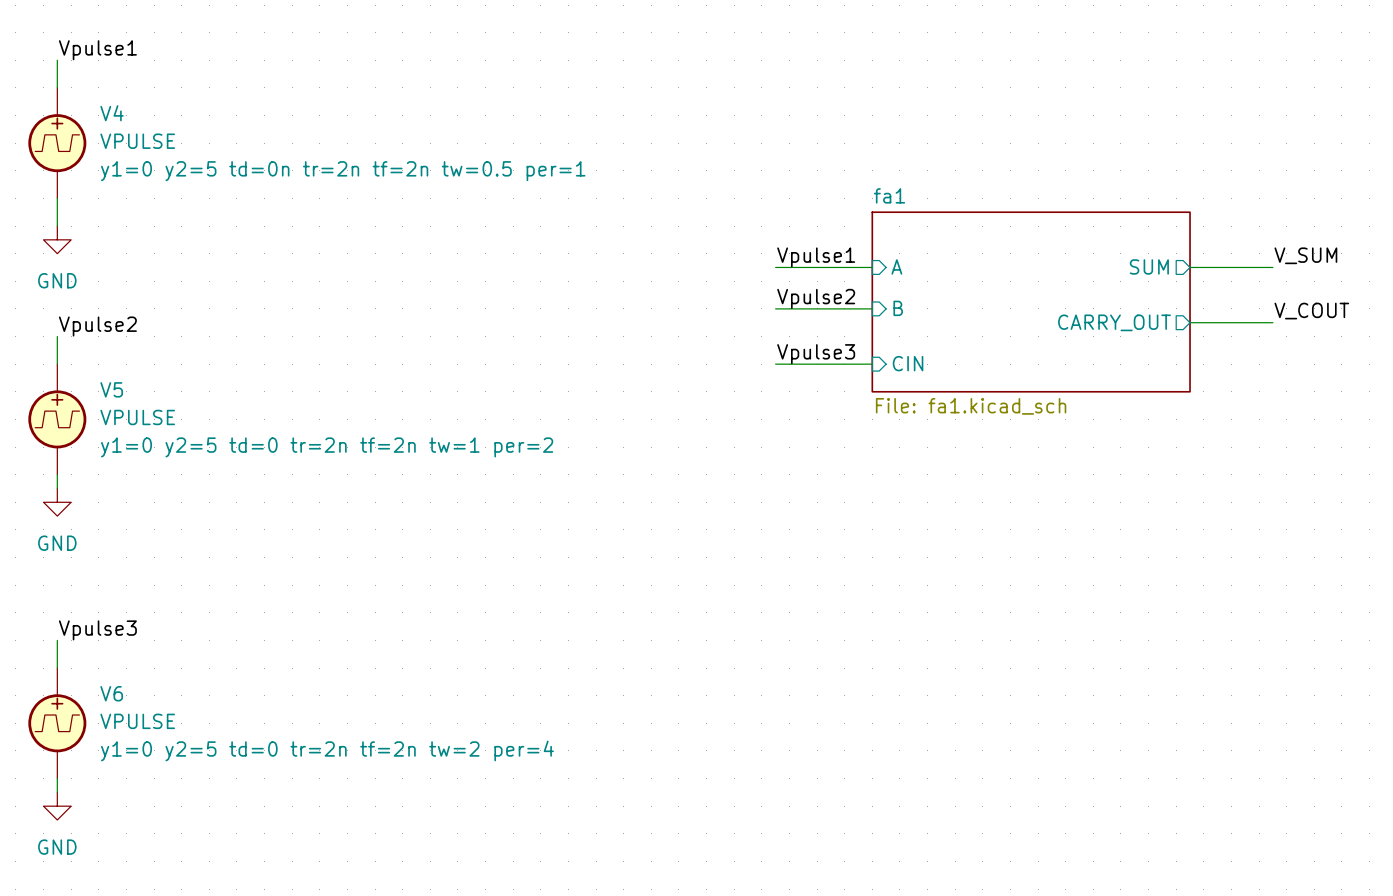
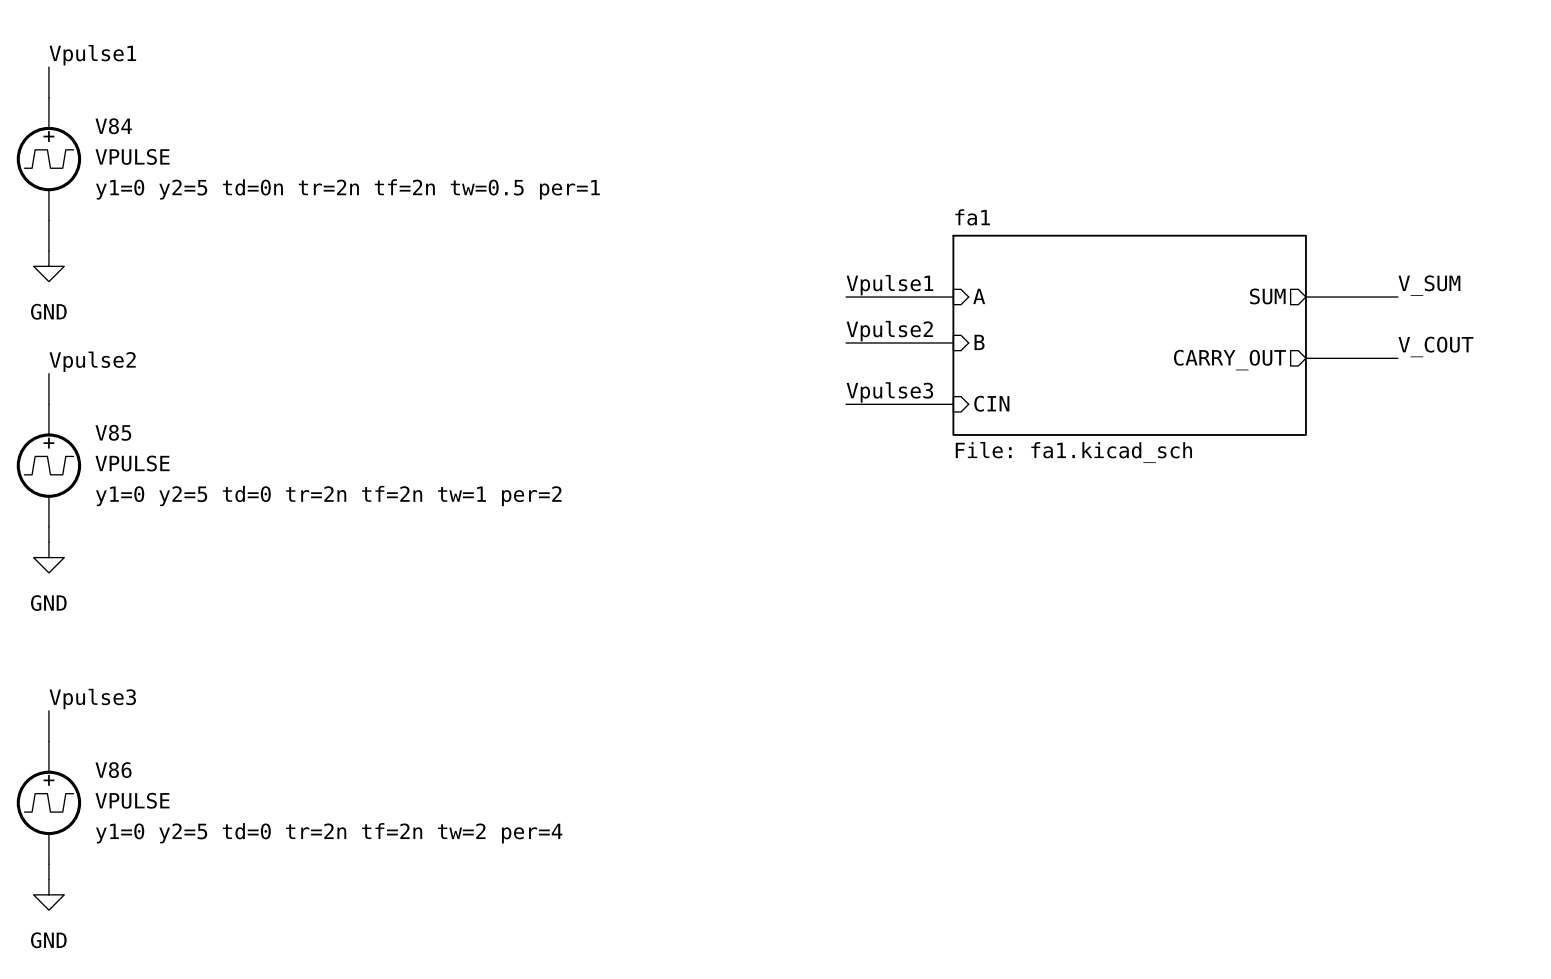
V4 name: V4 (112, 113) -> V84 (113, 126)
V5 name: V5 (111, 389) -> V85 (113, 432)
V6 name: V6 (111, 693) -> V86 (113, 770)

